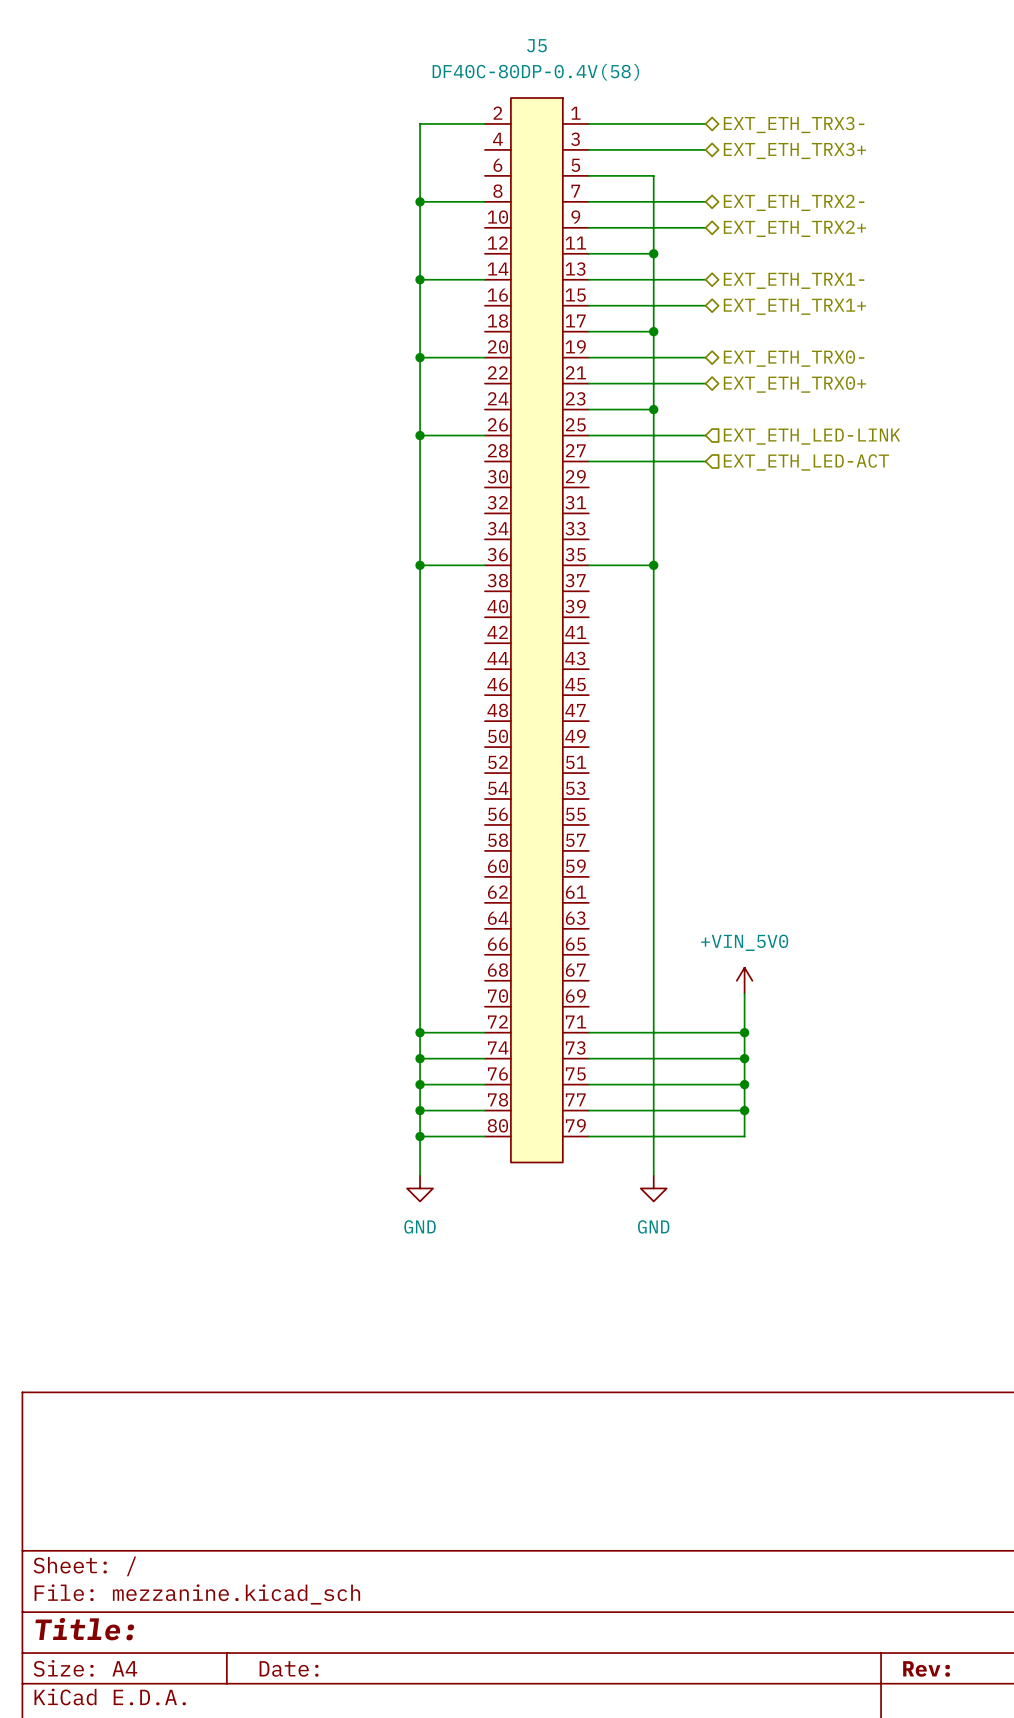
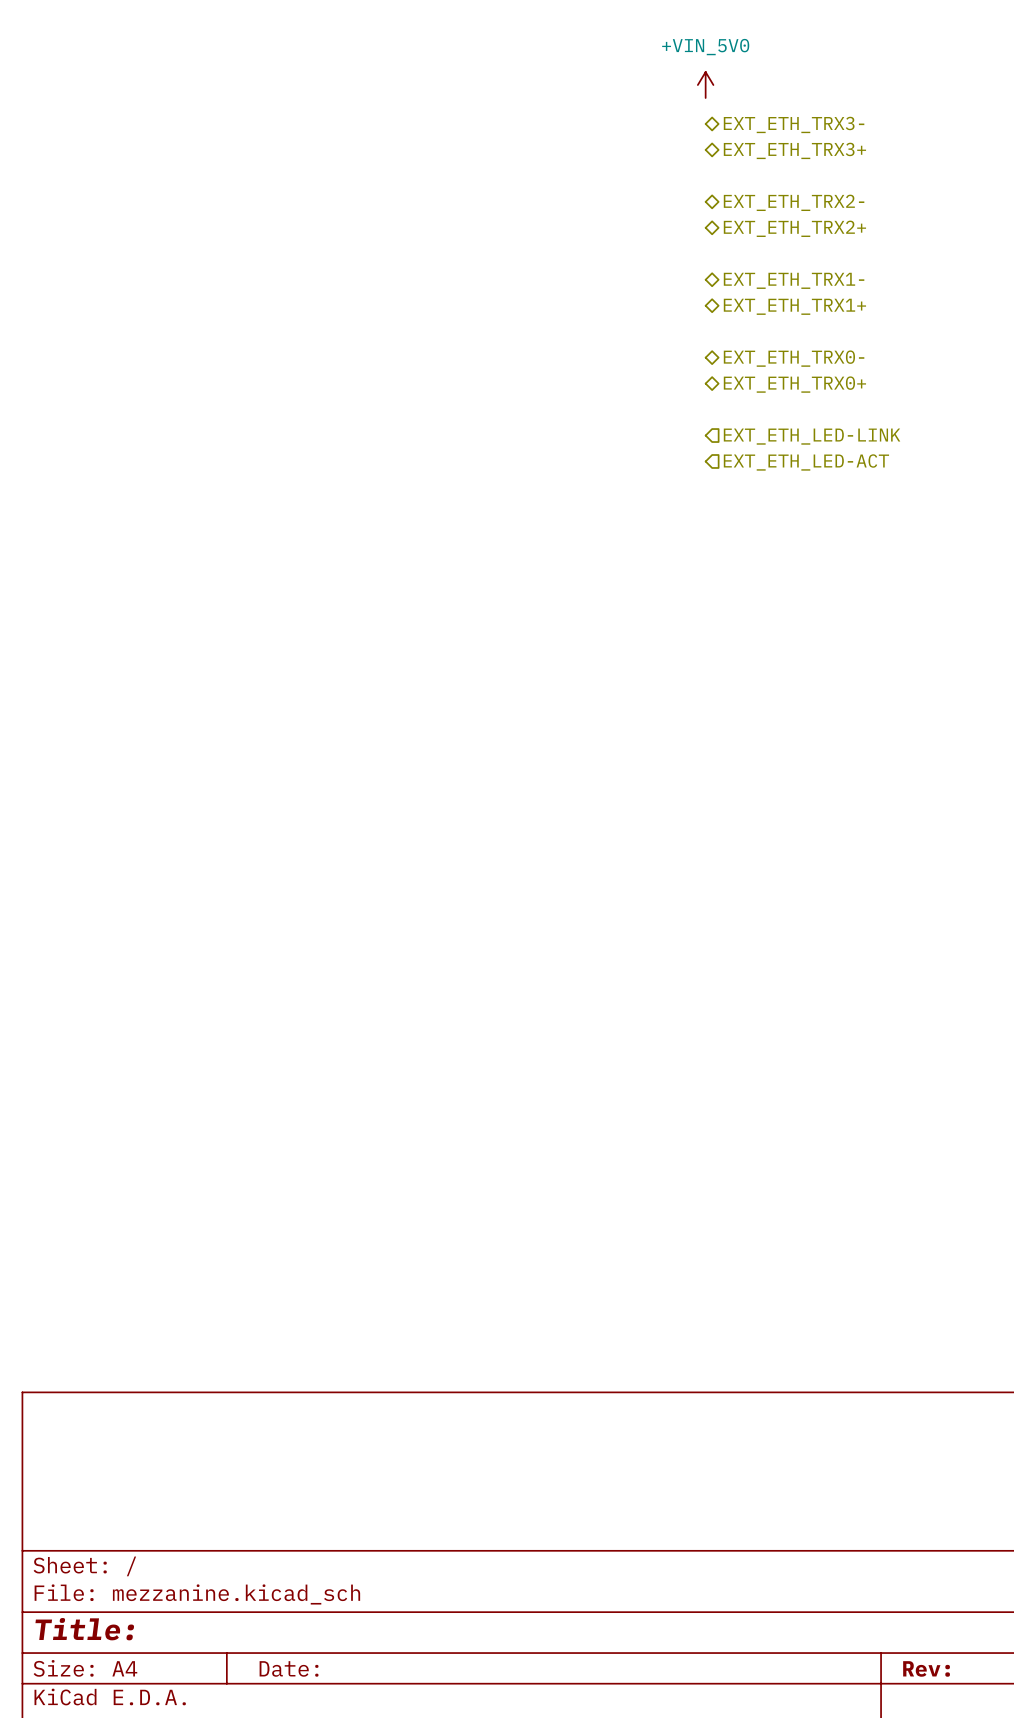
power symbol: none -> +VIN_5V0 (705, 85)
wire: (484, 123) (420, 123) (420, 1175) -> none
wire: (588, 123) (705, 123) -> none
wire: (588, 149) (705, 149) -> none
wire: (588, 175) (653, 175) (653, 1175) -> none
wire: (420, 201) (484, 201) -> none
junction: (420, 201) -> none
wire: (588, 201) (705, 201) -> none
wire: (588, 227) (705, 227) -> none
wire: (588, 253) (653, 253) -> none
junction: (653, 253) -> none
wire: (420, 279) (484, 279) -> none
junction: (420, 279) -> none
wire: (588, 279) (705, 279) -> none
wire: (588, 305) (705, 305) -> none
wire: (588, 331) (653, 331) -> none
junction: (653, 331) -> none
wire: (420, 357) (484, 357) -> none
junction: (420, 357) -> none
wire: (588, 357) (705, 357) -> none
wire: (588, 383) (705, 383) -> none
wire: (588, 409) (653, 409) -> none
junction: (653, 409) -> none
wire: (420, 435) (484, 435) -> none
junction: (420, 435) -> none
wire: (588, 435) (705, 435) -> none
wire: (588, 461) (705, 461) -> none
wire: (420, 565) (484, 565) -> none
junction: (420, 565) -> none
wire: (588, 565) (653, 565) -> none
junction: (653, 565) -> none
J5: DF40C-80DP-0.4V(58) (536, 630) -> none
power symbol: +VIN_5V0 (744, 980) -> none
wire: (744, 993) (744, 1136) (588, 1136) -> none
wire: (420, 1032) (484, 1032) -> none
junction: (420, 1032) -> none
wire: (588, 1032) (744, 1032) -> none
junction: (744, 1032) -> none
wire: (420, 1058) (484, 1058) -> none
junction: (420, 1058) -> none
wire: (588, 1058) (744, 1058) -> none
junction: (744, 1058) -> none
wire: (420, 1084) (484, 1084) -> none
junction: (420, 1084) -> none
wire: (588, 1084) (744, 1084) -> none
junction: (744, 1084) -> none
wire: (420, 1110) (484, 1110) -> none
junction: (420, 1110) -> none
wire: (588, 1110) (744, 1110) -> none
junction: (744, 1110) -> none
wire: (420, 1136) (484, 1136) -> none
junction: (420, 1136) -> none
power symbol: GND (420, 1188) -> none
power symbol: GND (653, 1188) -> none

